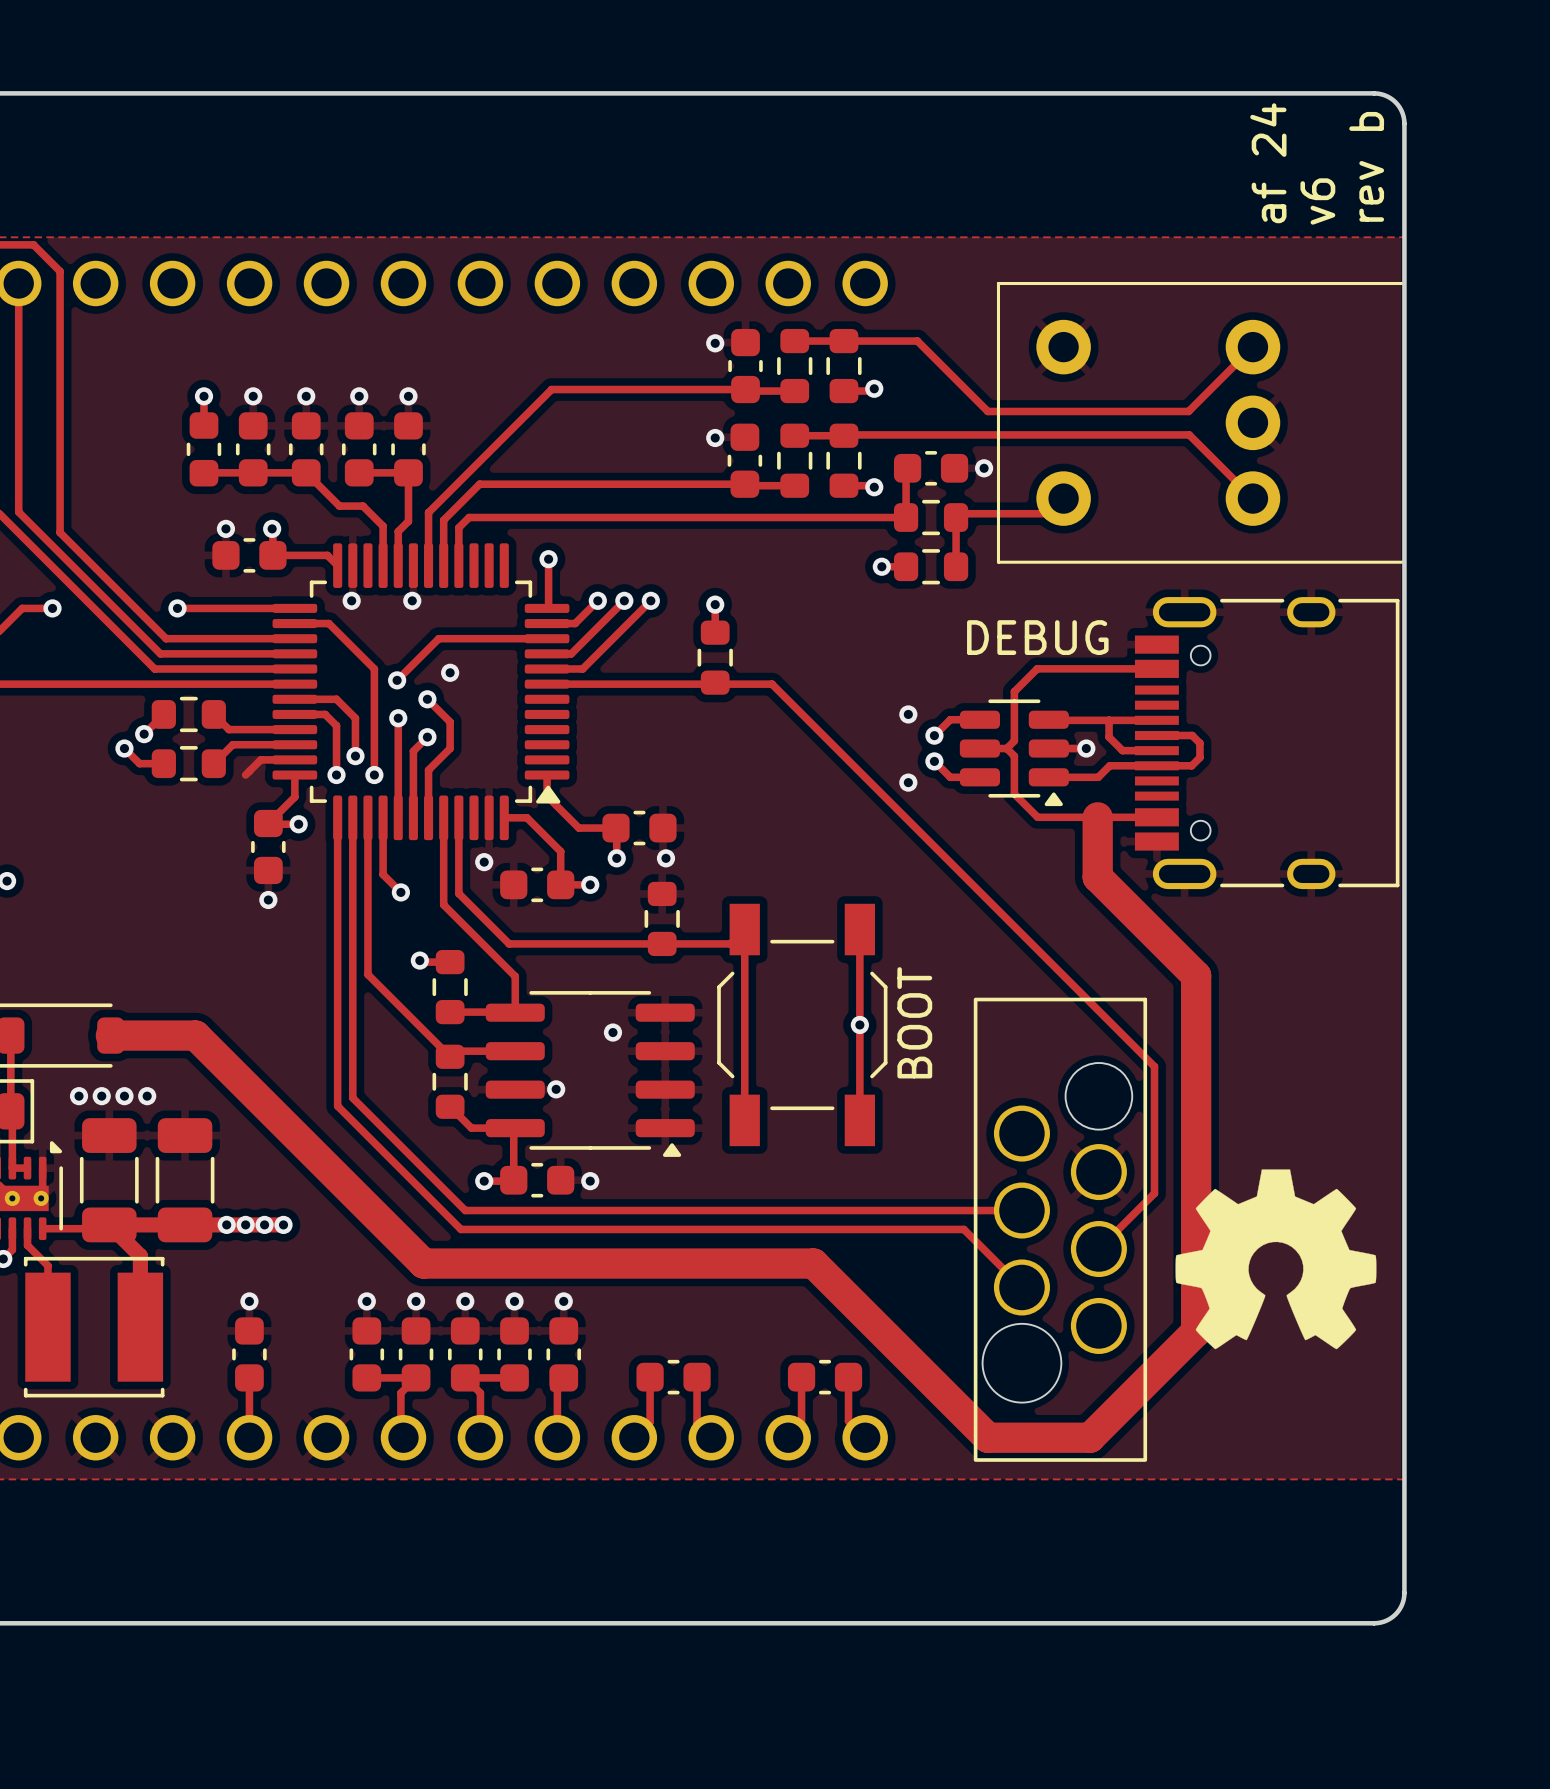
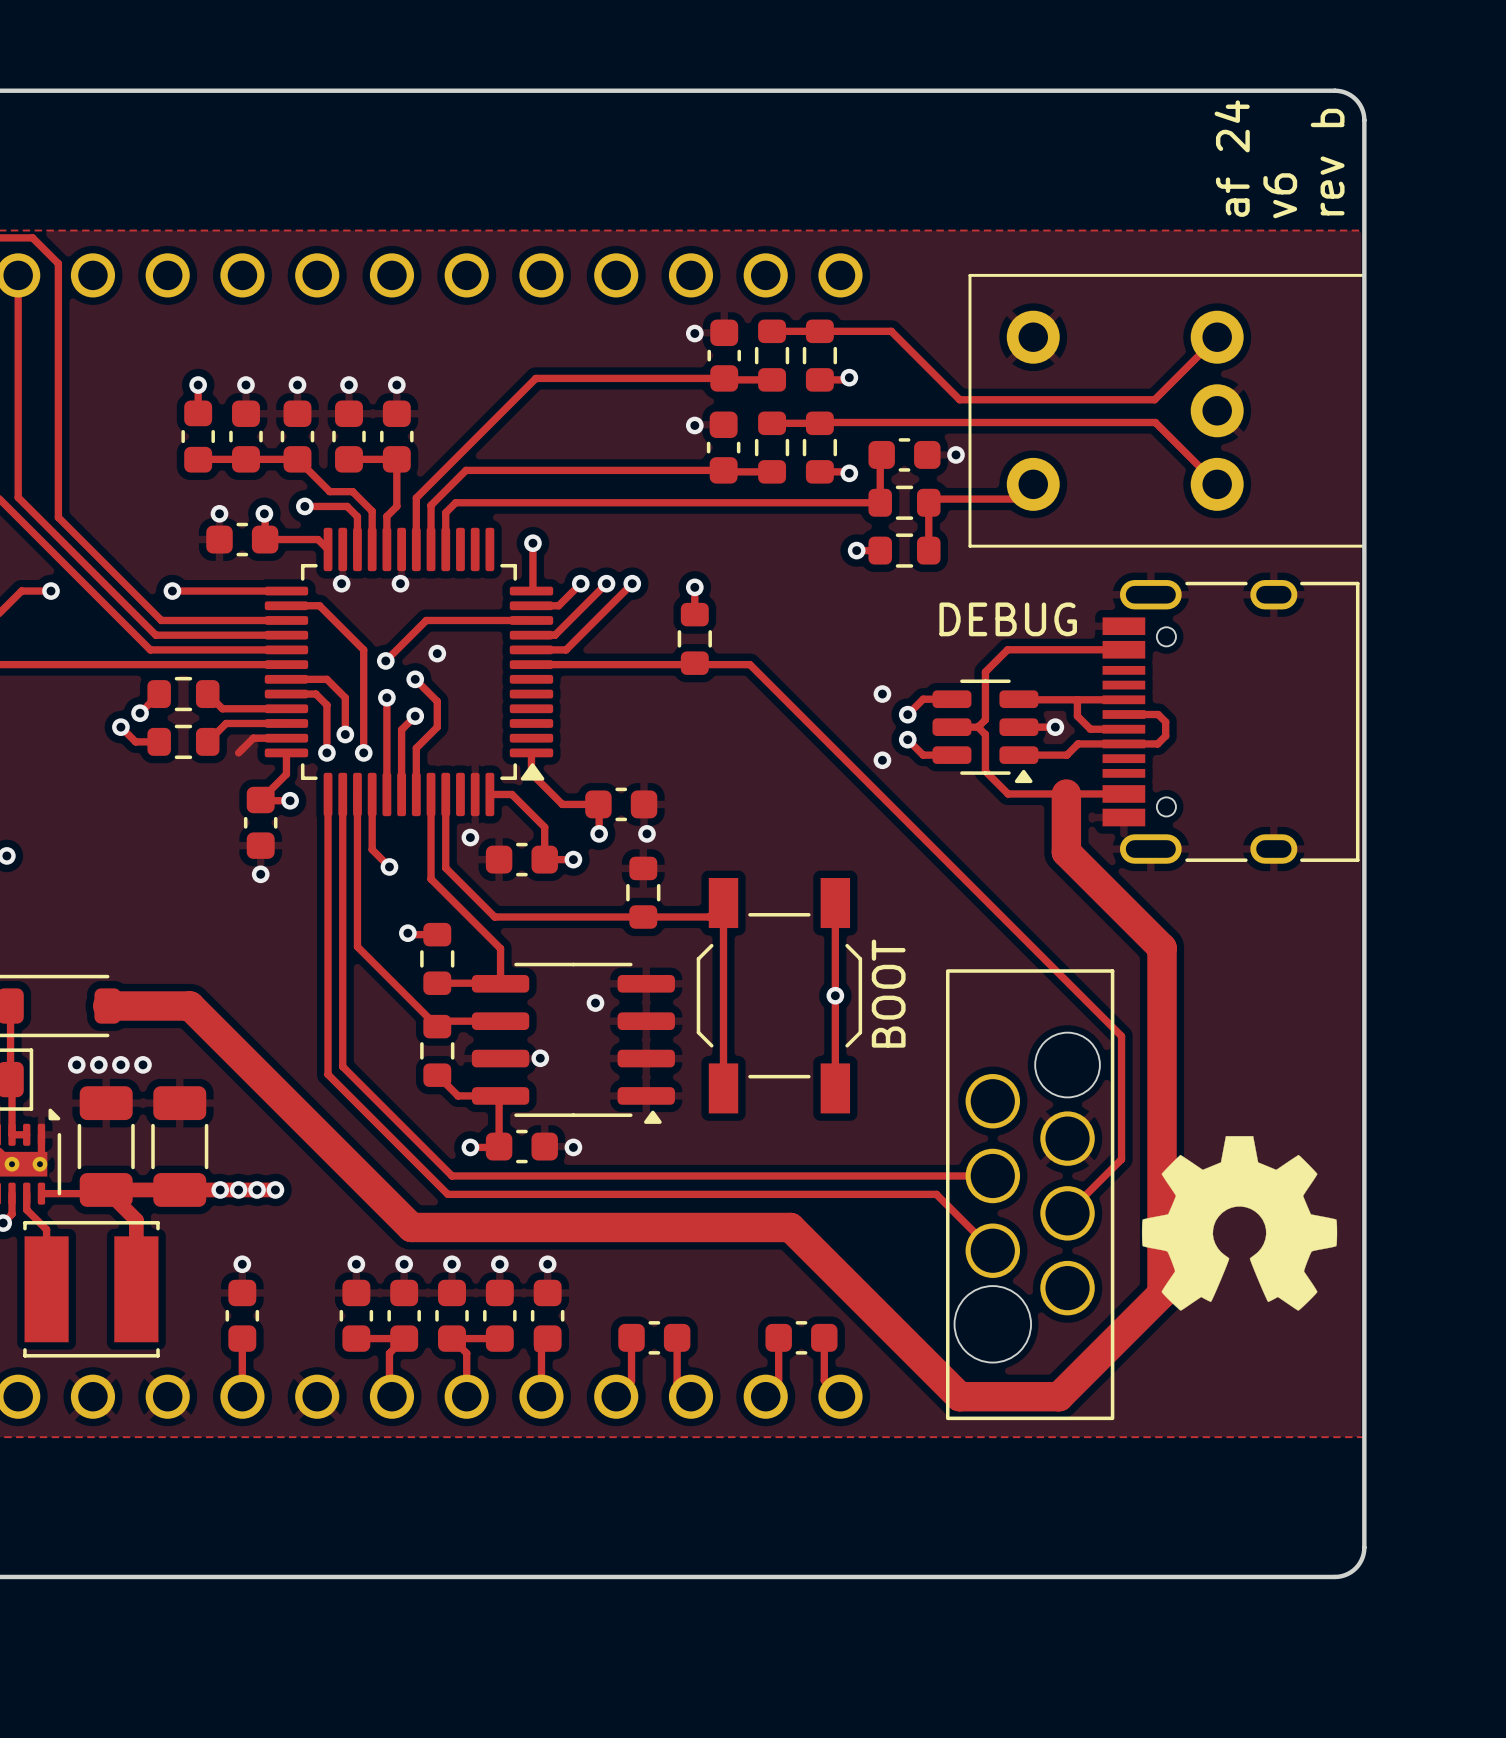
track: none -> (304, 506) (347, 506) (357, 516) (357, 549)
via: none -> (304, 506)

